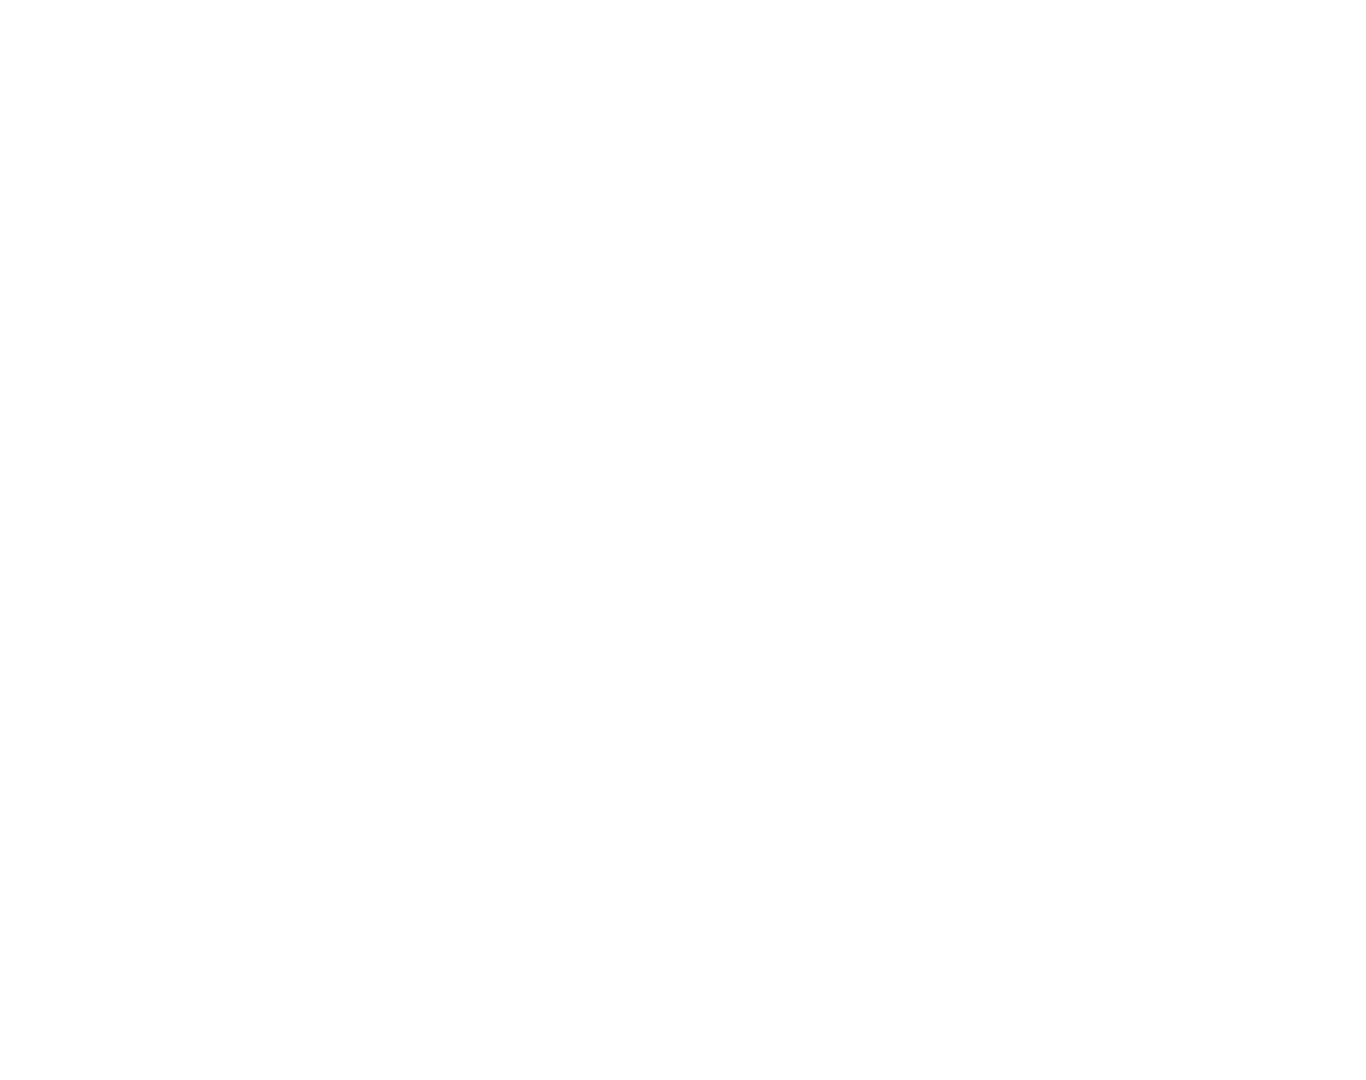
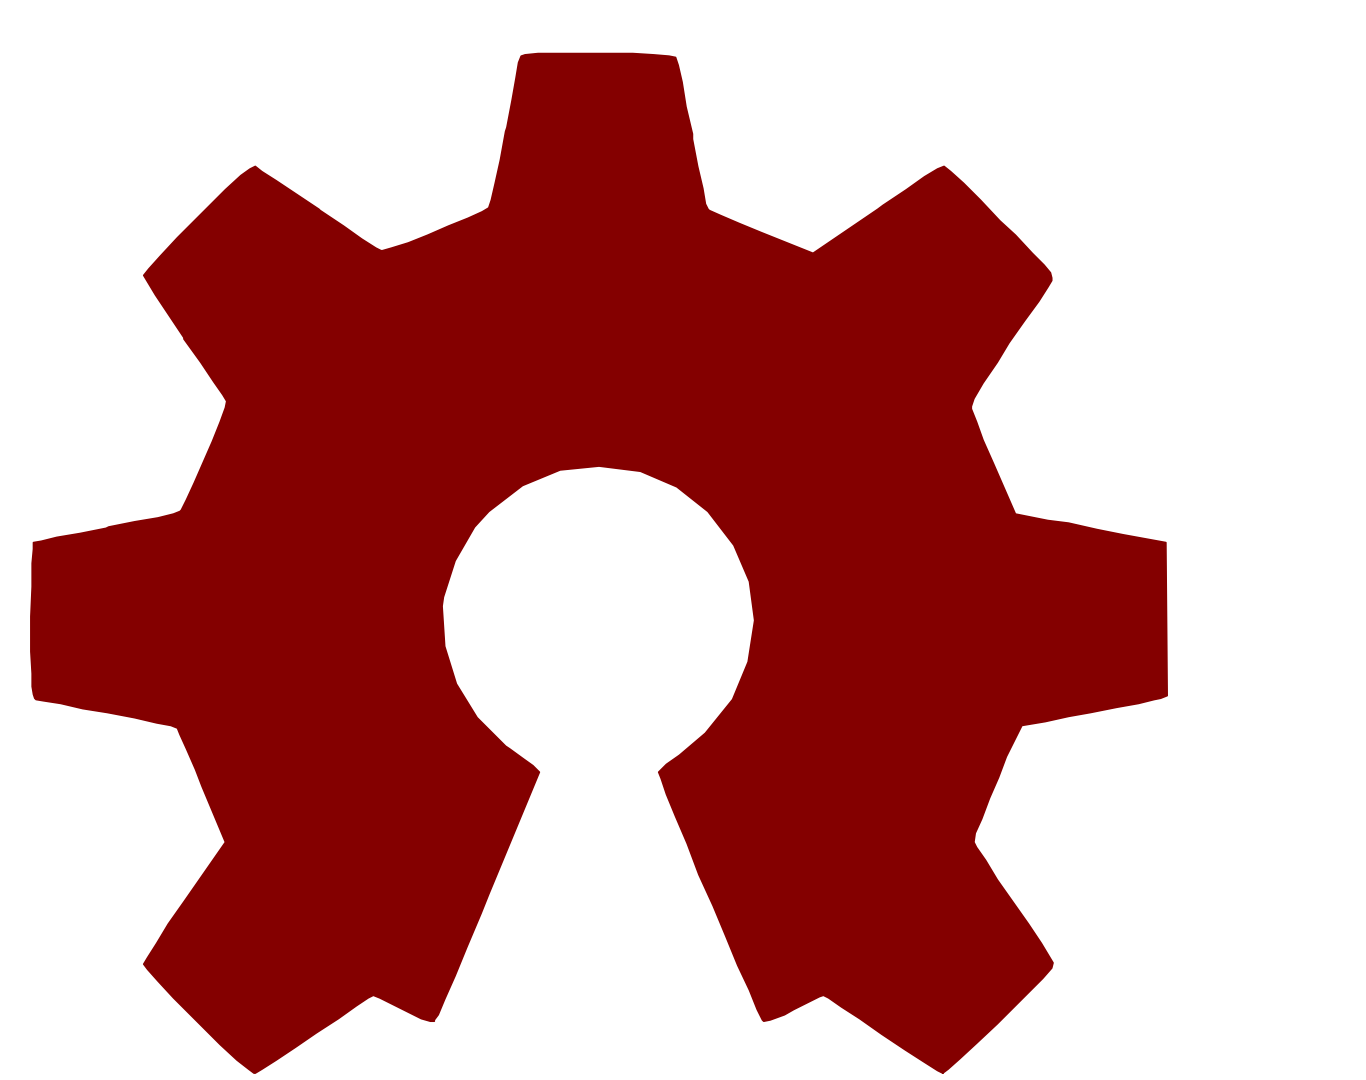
power symbol: none -> (599, 563)

